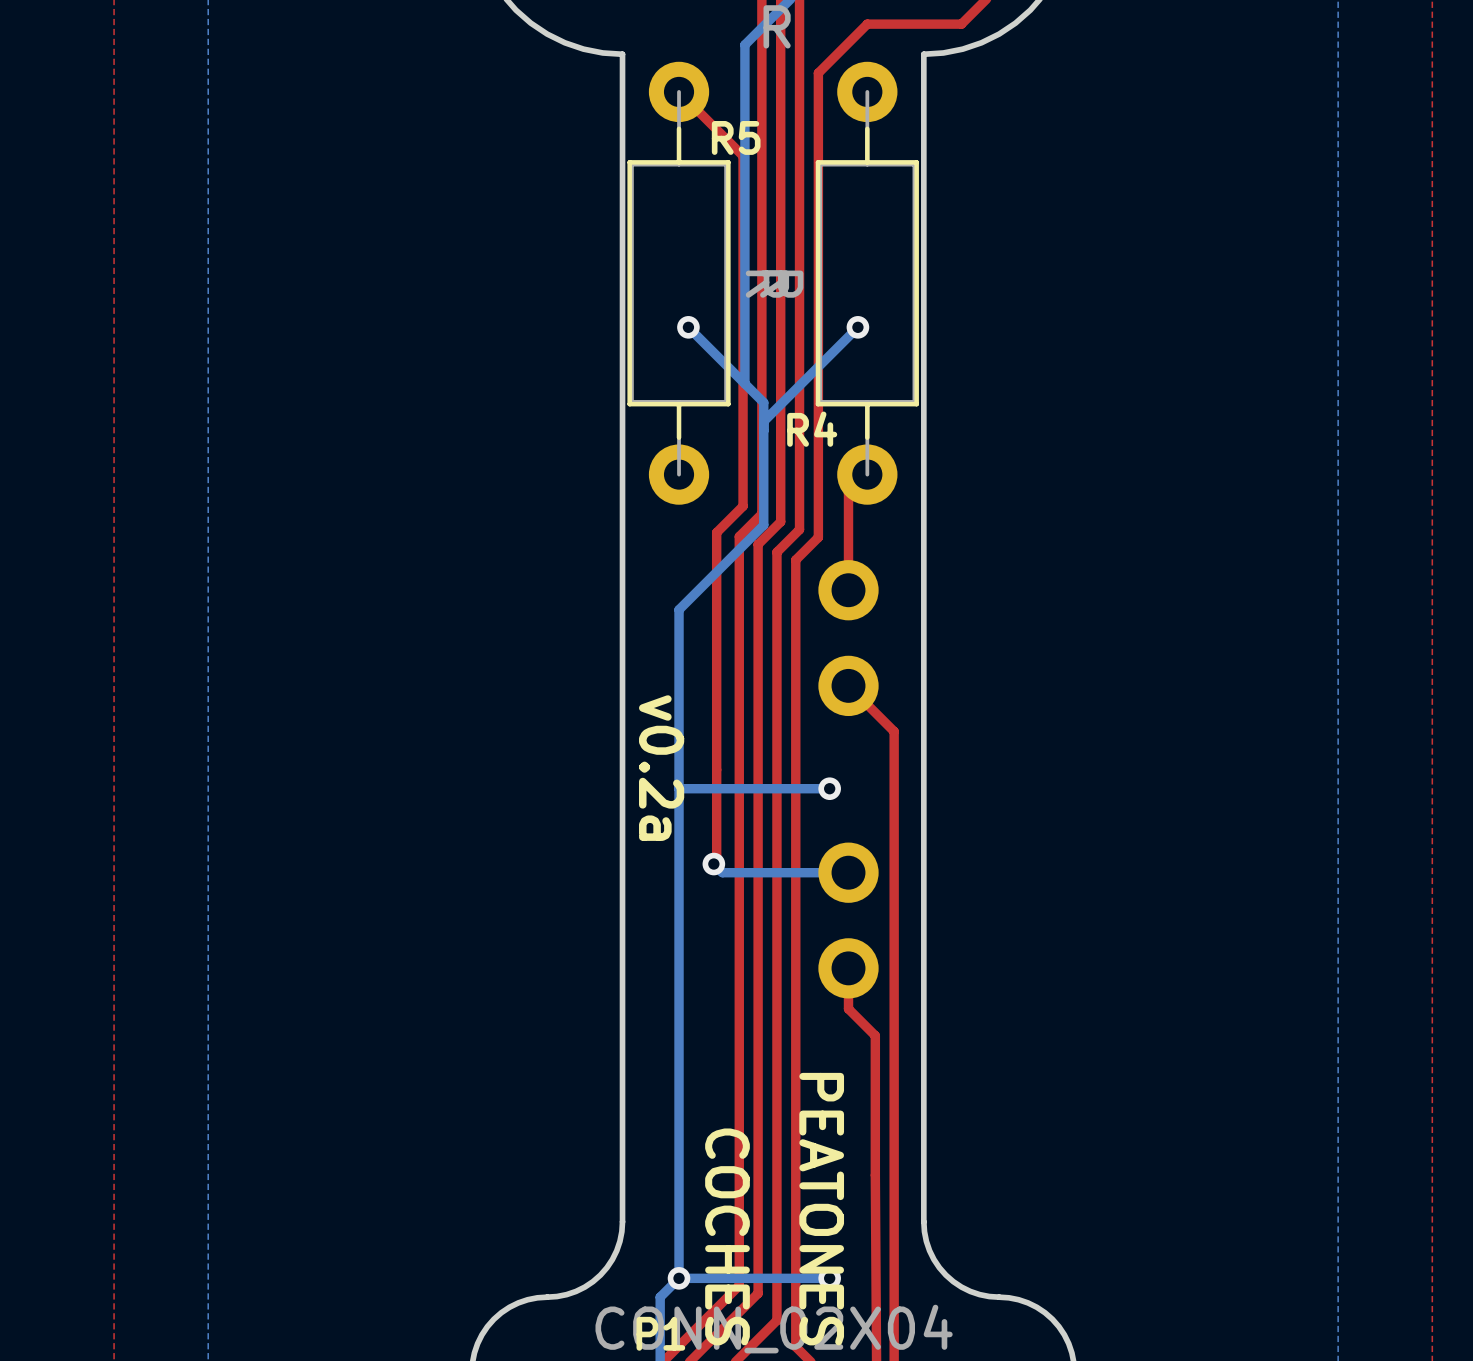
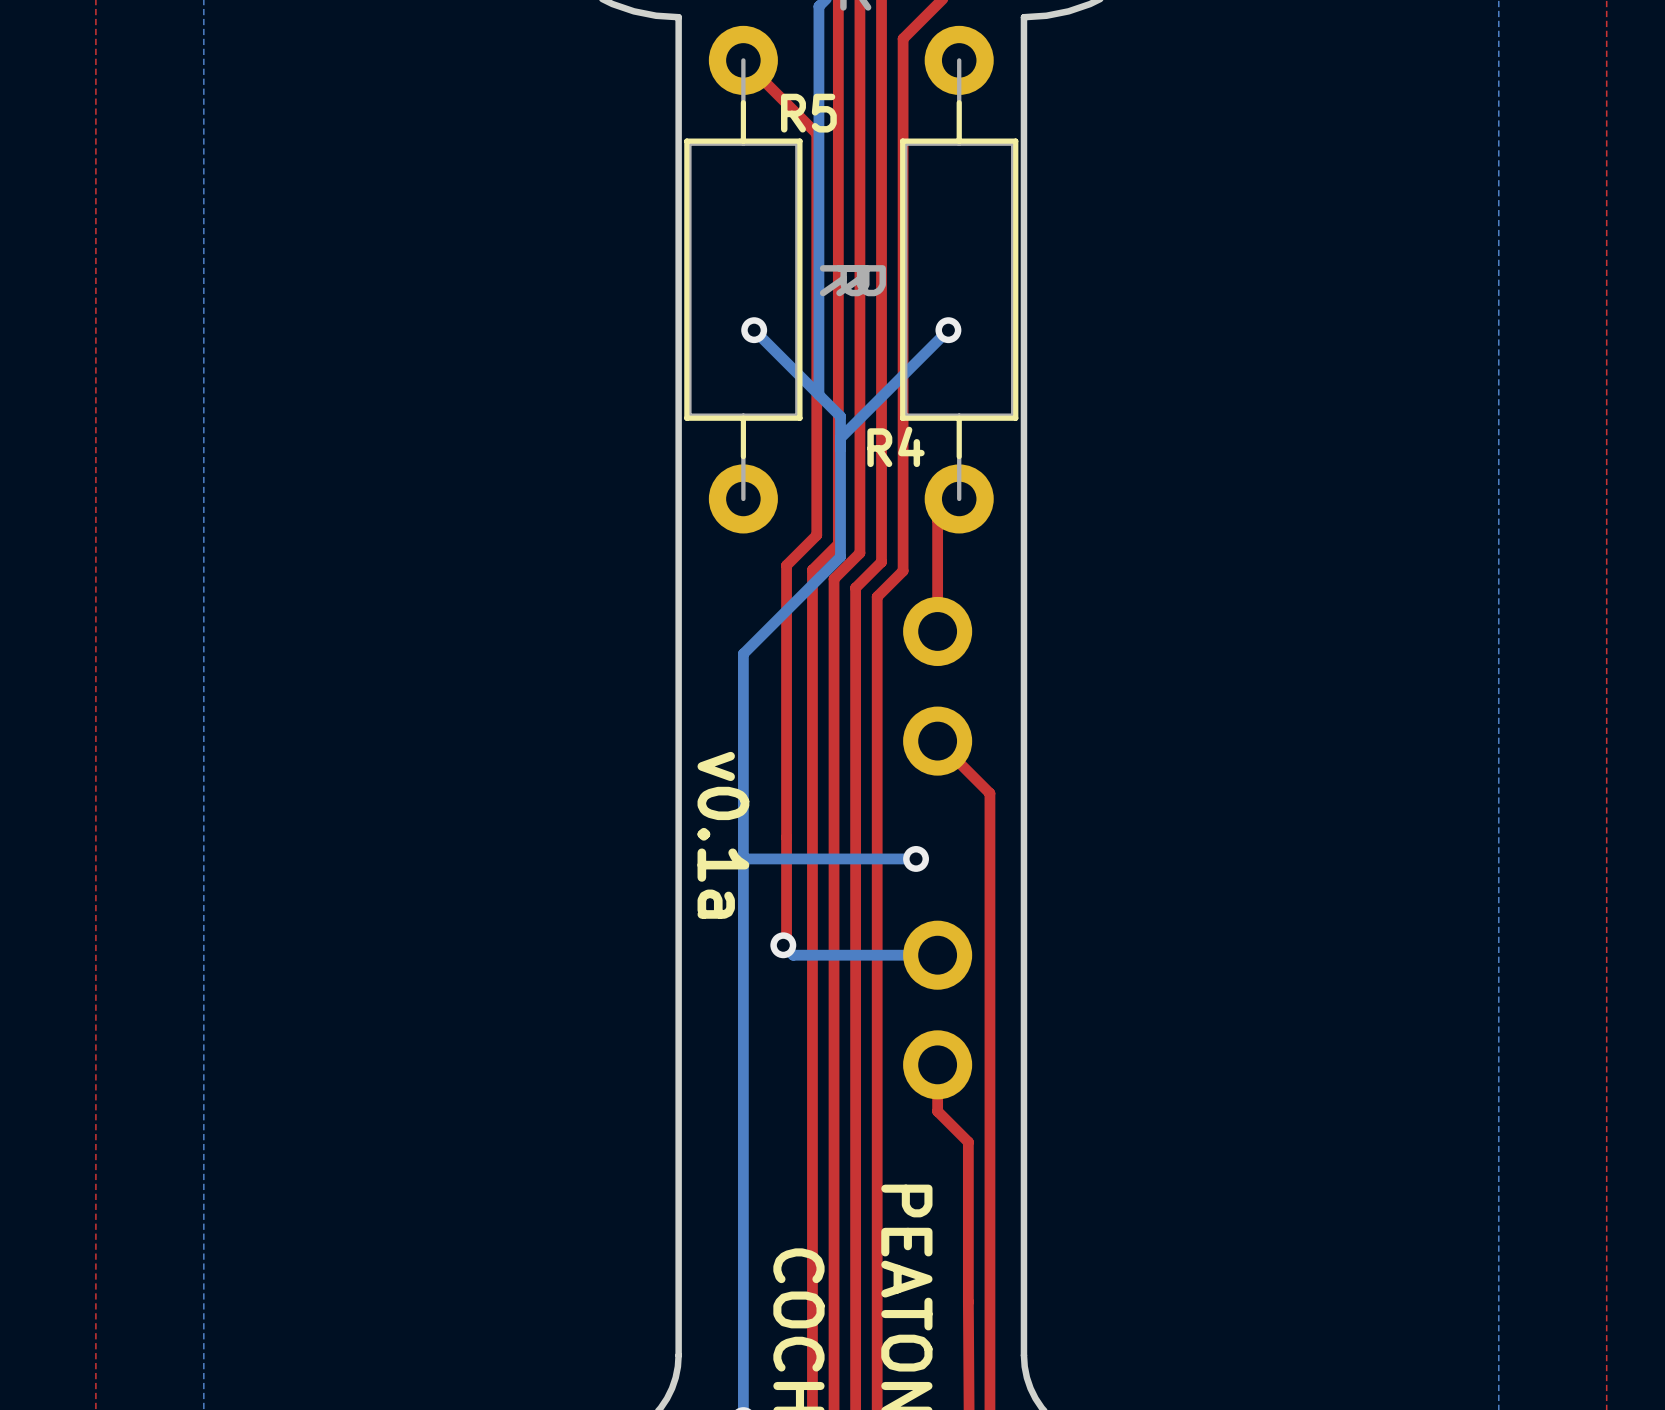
text: v0.2a (661, 768) -> v0.1a (723, 835)

